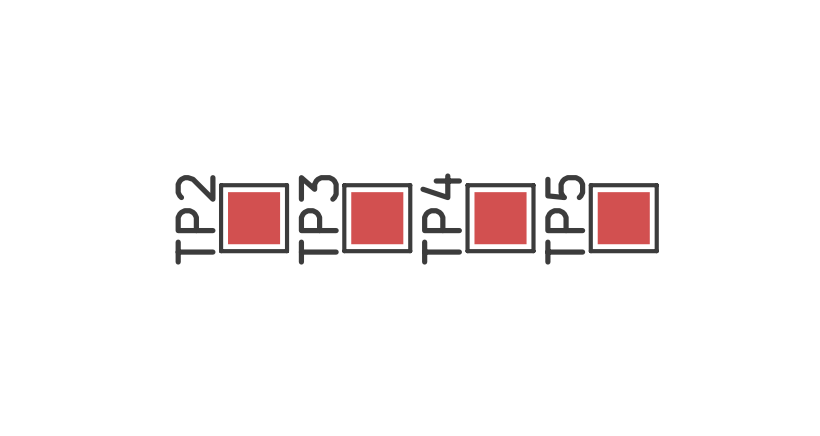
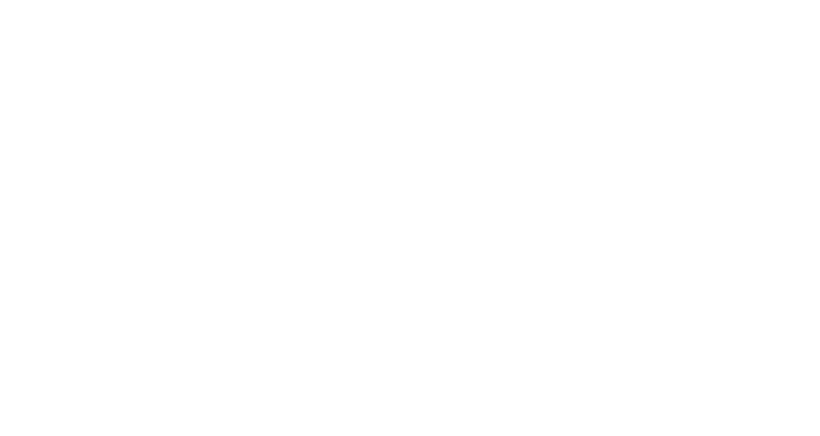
TP2: (254, 218) -> none
TP3: (377, 218) -> none
TP4: (500, 218) -> none
TP5: (623, 218) -> none

